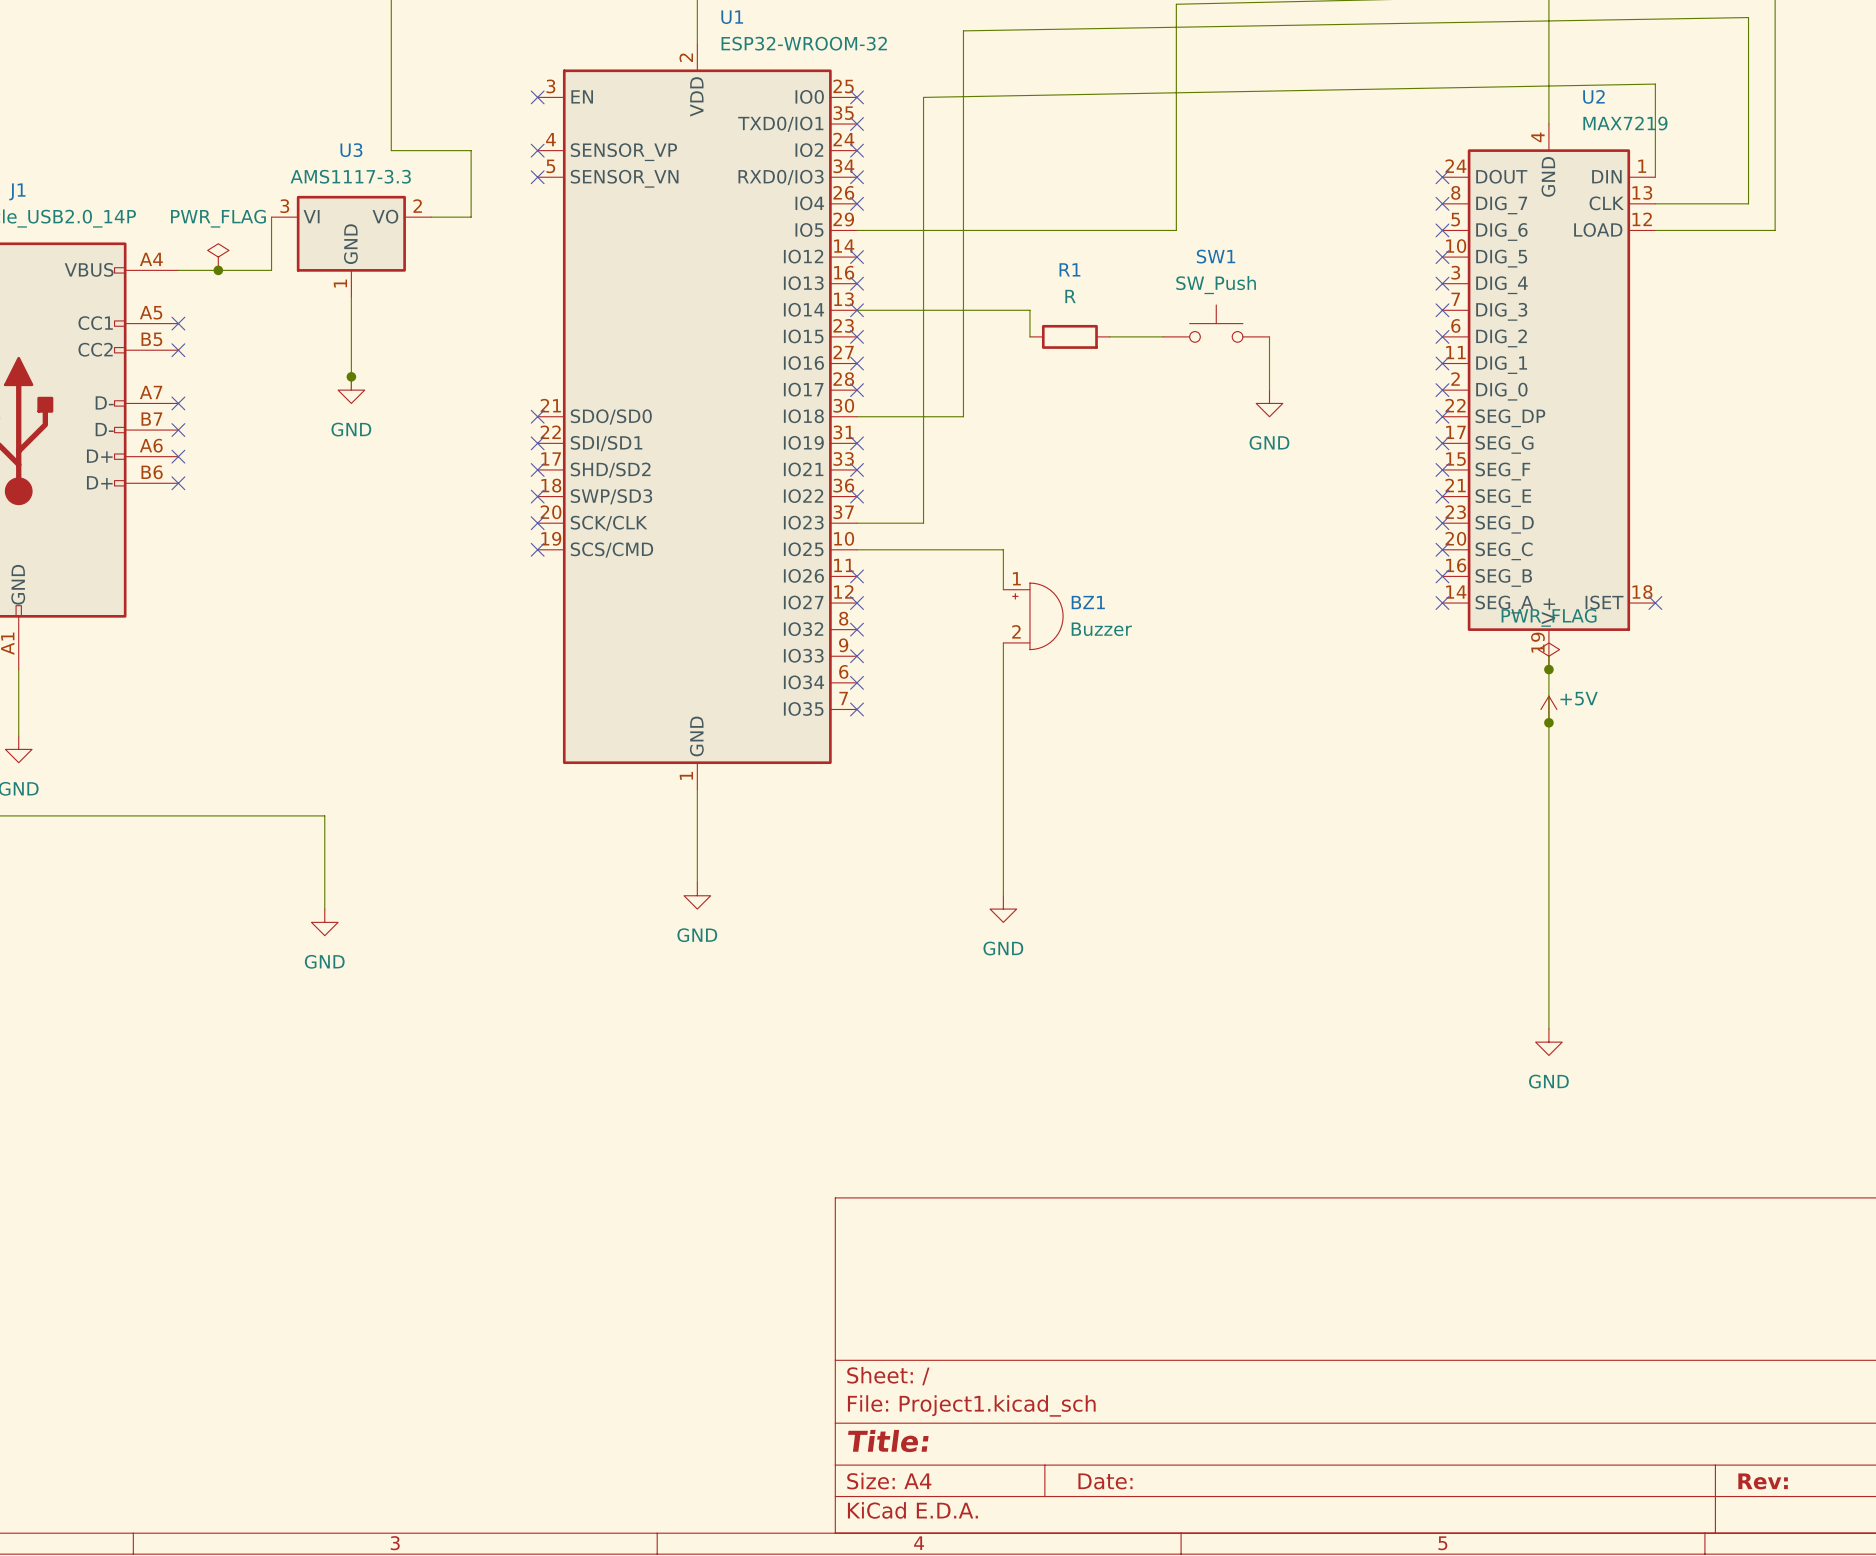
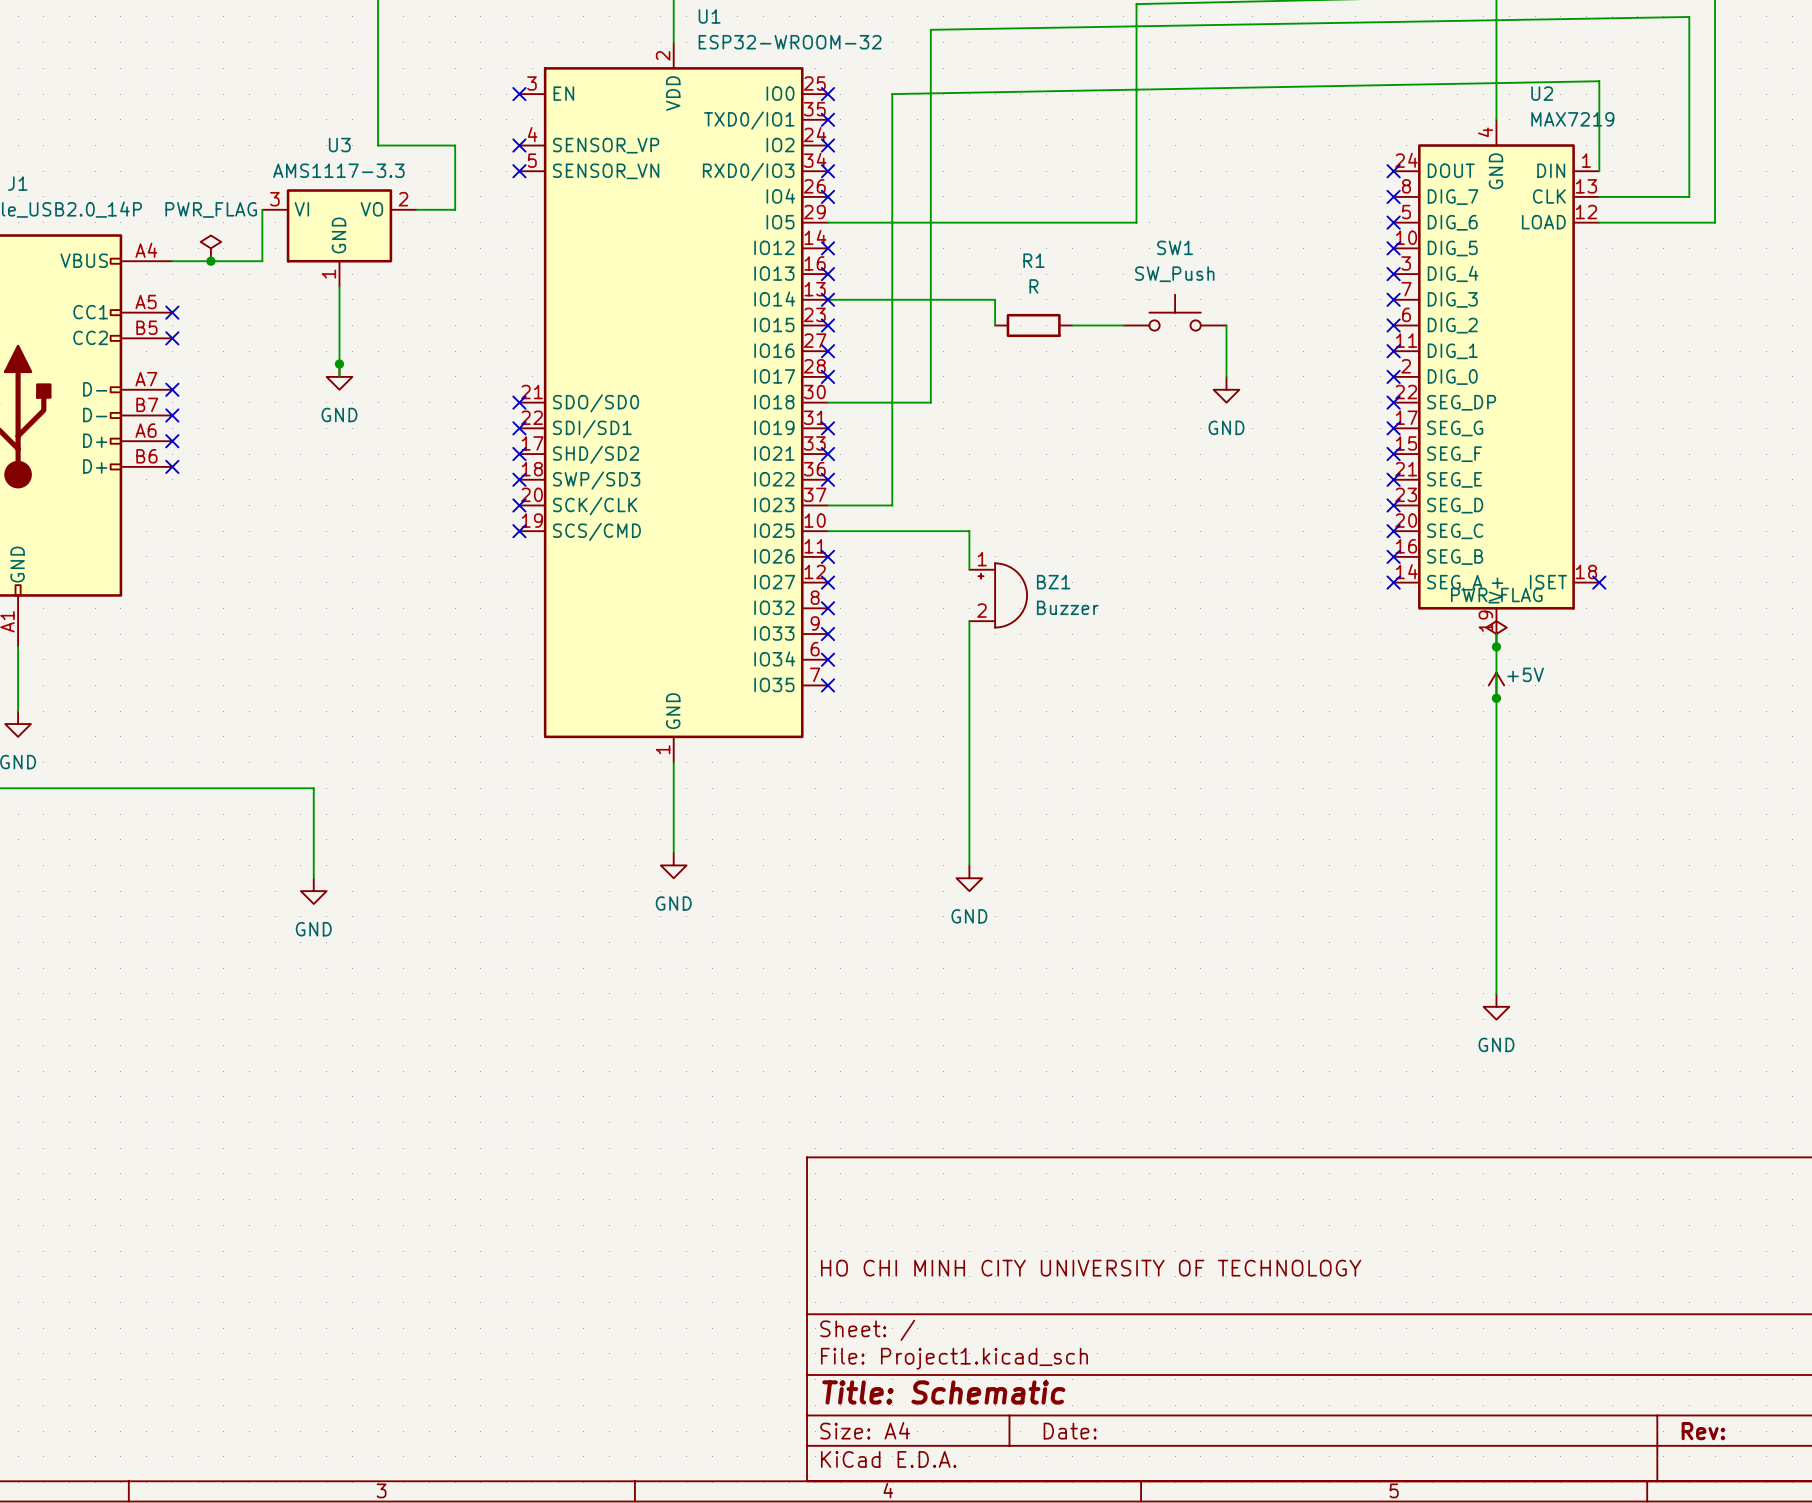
title block: none -> HO CHI MINH CITY UNIVERSITY OF TECHNOLOGY (1091, 1268)
title block: Title: (888, 1441) -> Title: Schematic (943, 1392)

